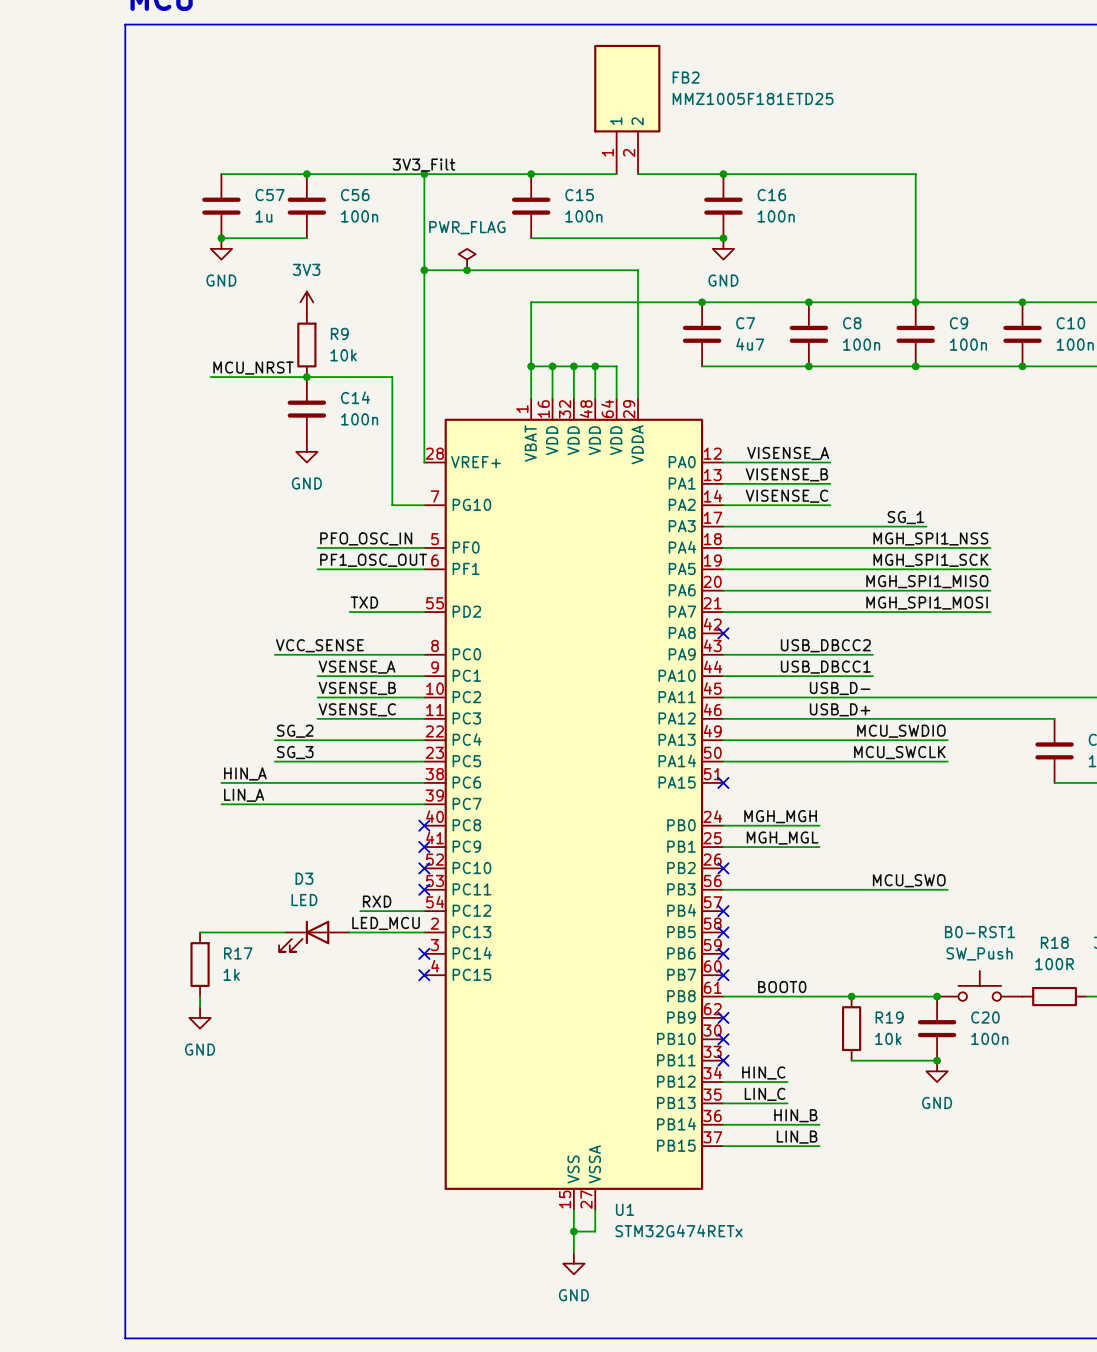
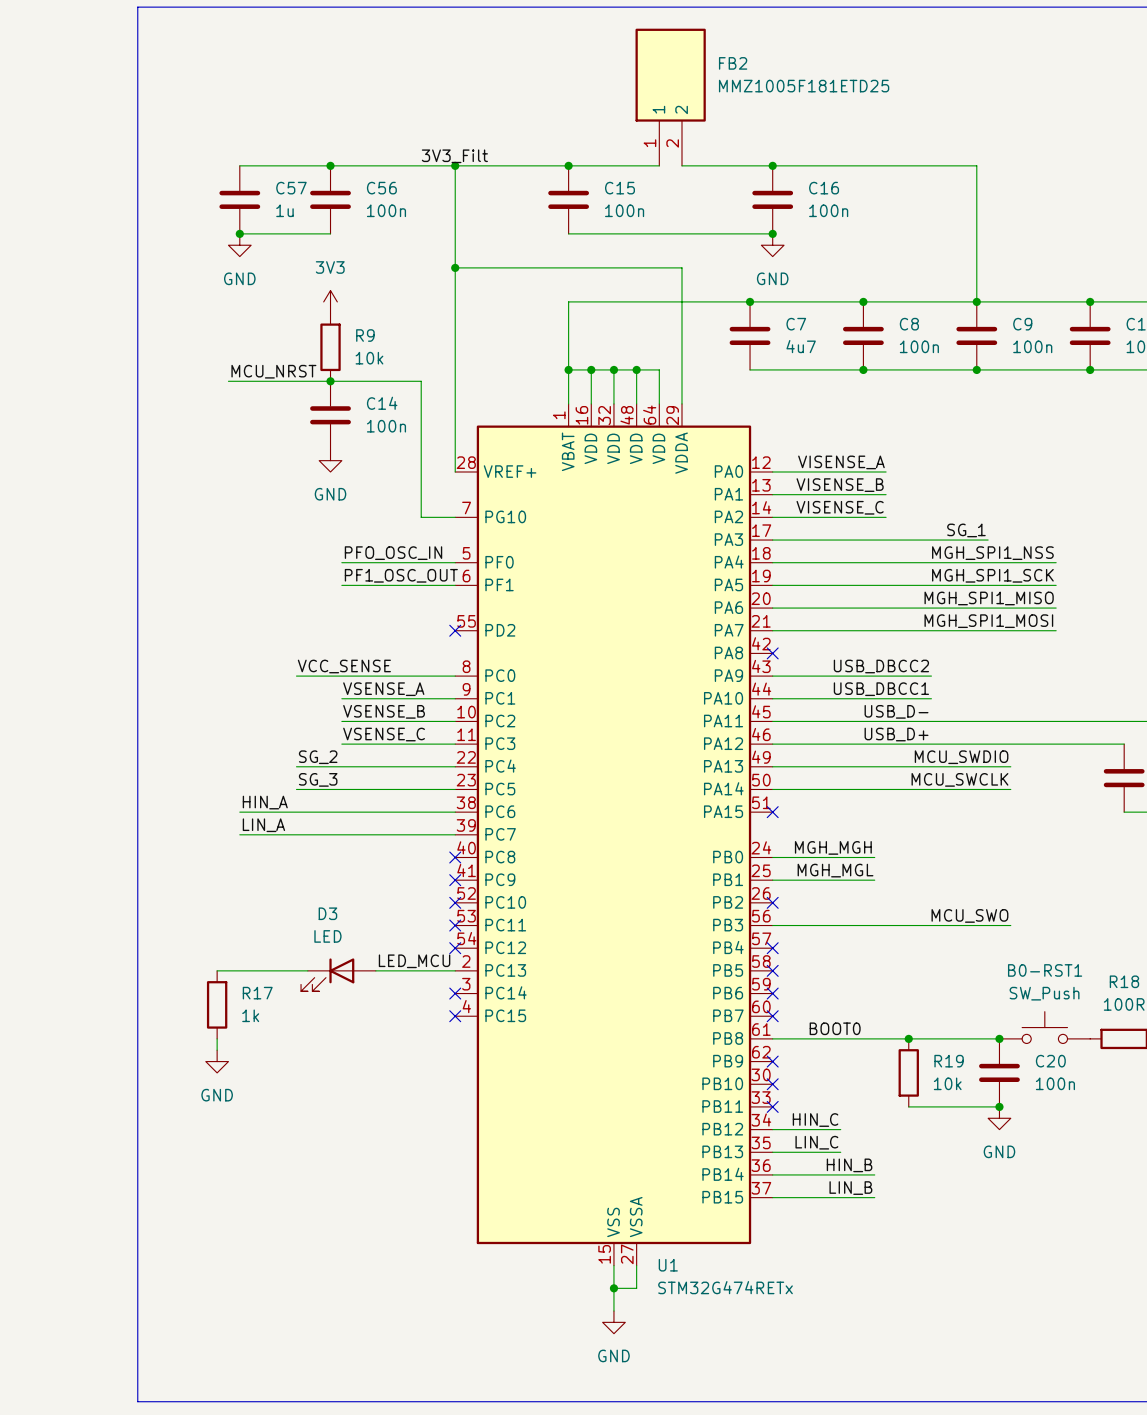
power symbol: PWR_FLAG (467, 259) -> none
junction: (467, 270) -> none
label: TXD (364, 602) -> none
wire: (349, 612) (424, 612) -> none
no-connect mark: none -> (455, 630)
label: RXD (377, 901) -> none
wire: (360, 911) (424, 911) -> none
no-connect mark: none -> (455, 948)

